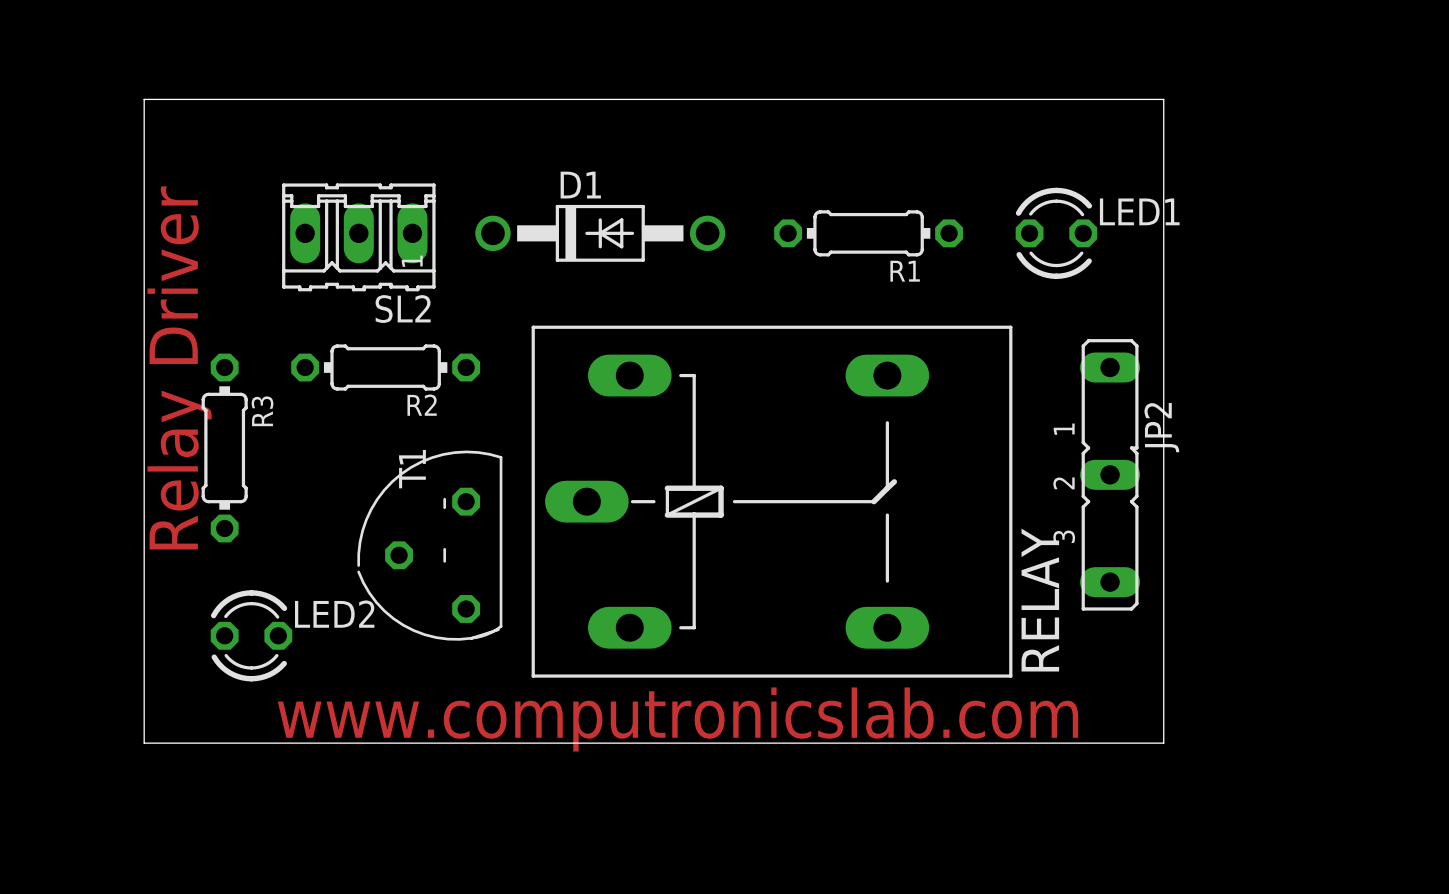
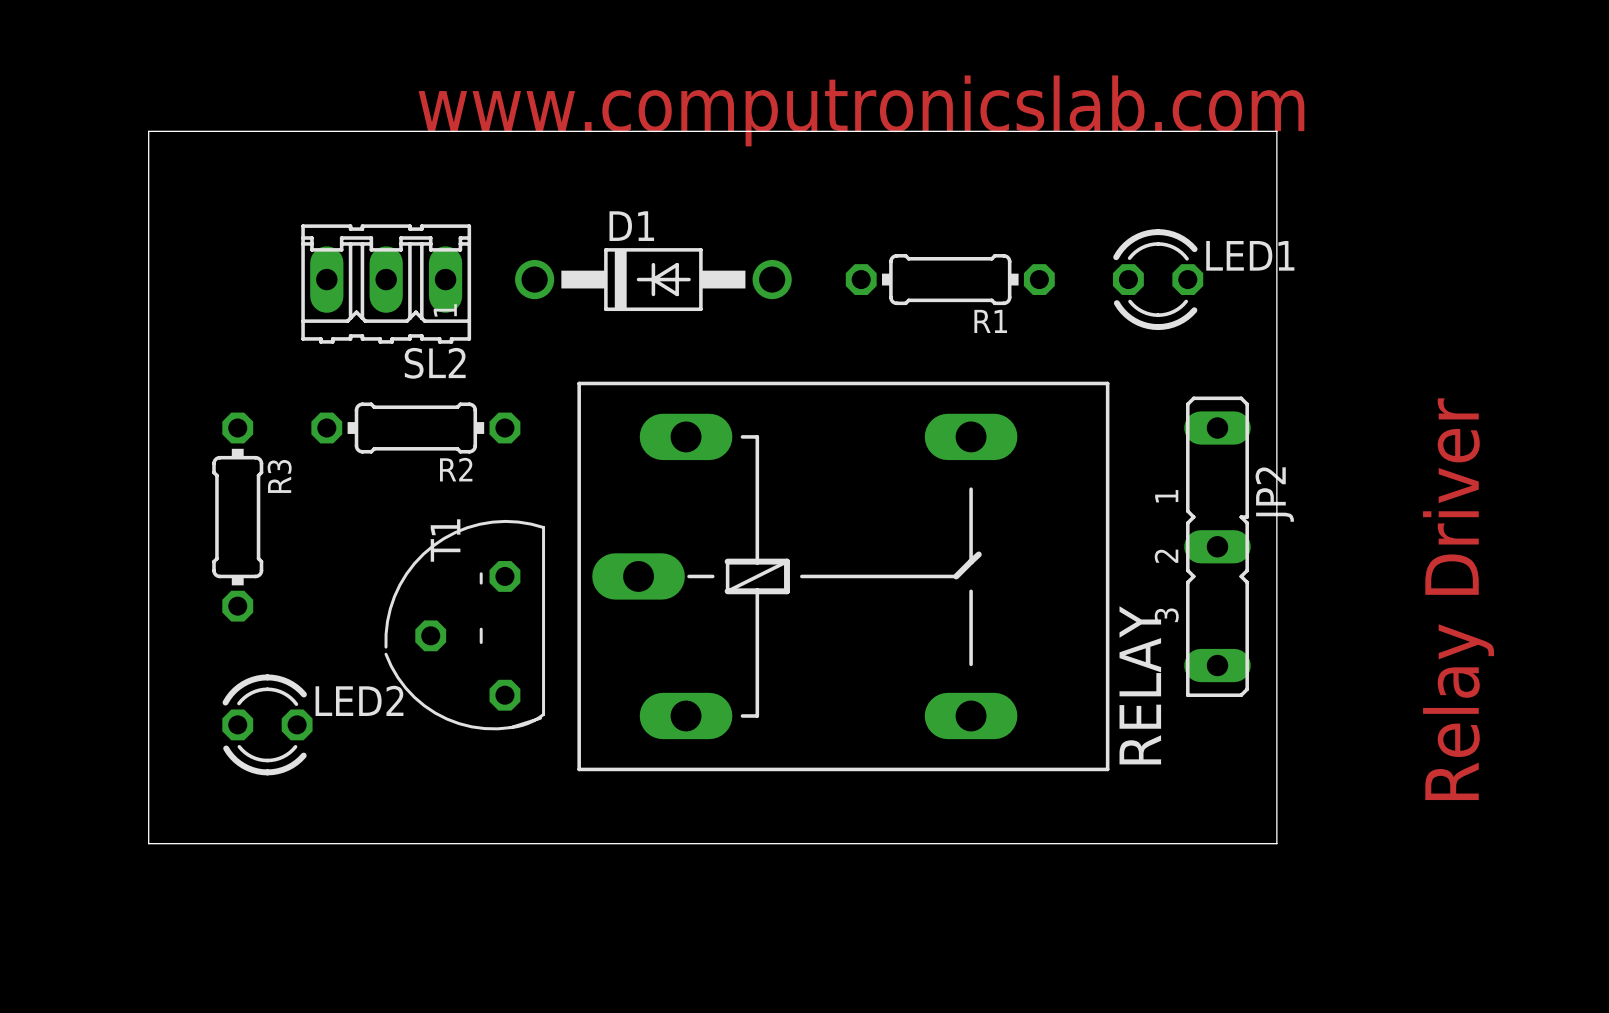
text: none -> www.computronicslab.com (861, 110)
text: Relay Driver (179, 367) -> none
text: none -> Relay Driver (1458, 599)
text: www.computronicslab.com (677, 719) -> none

